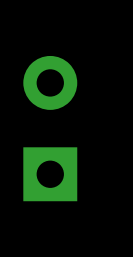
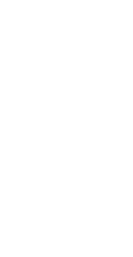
part: (50, 128) -> none

